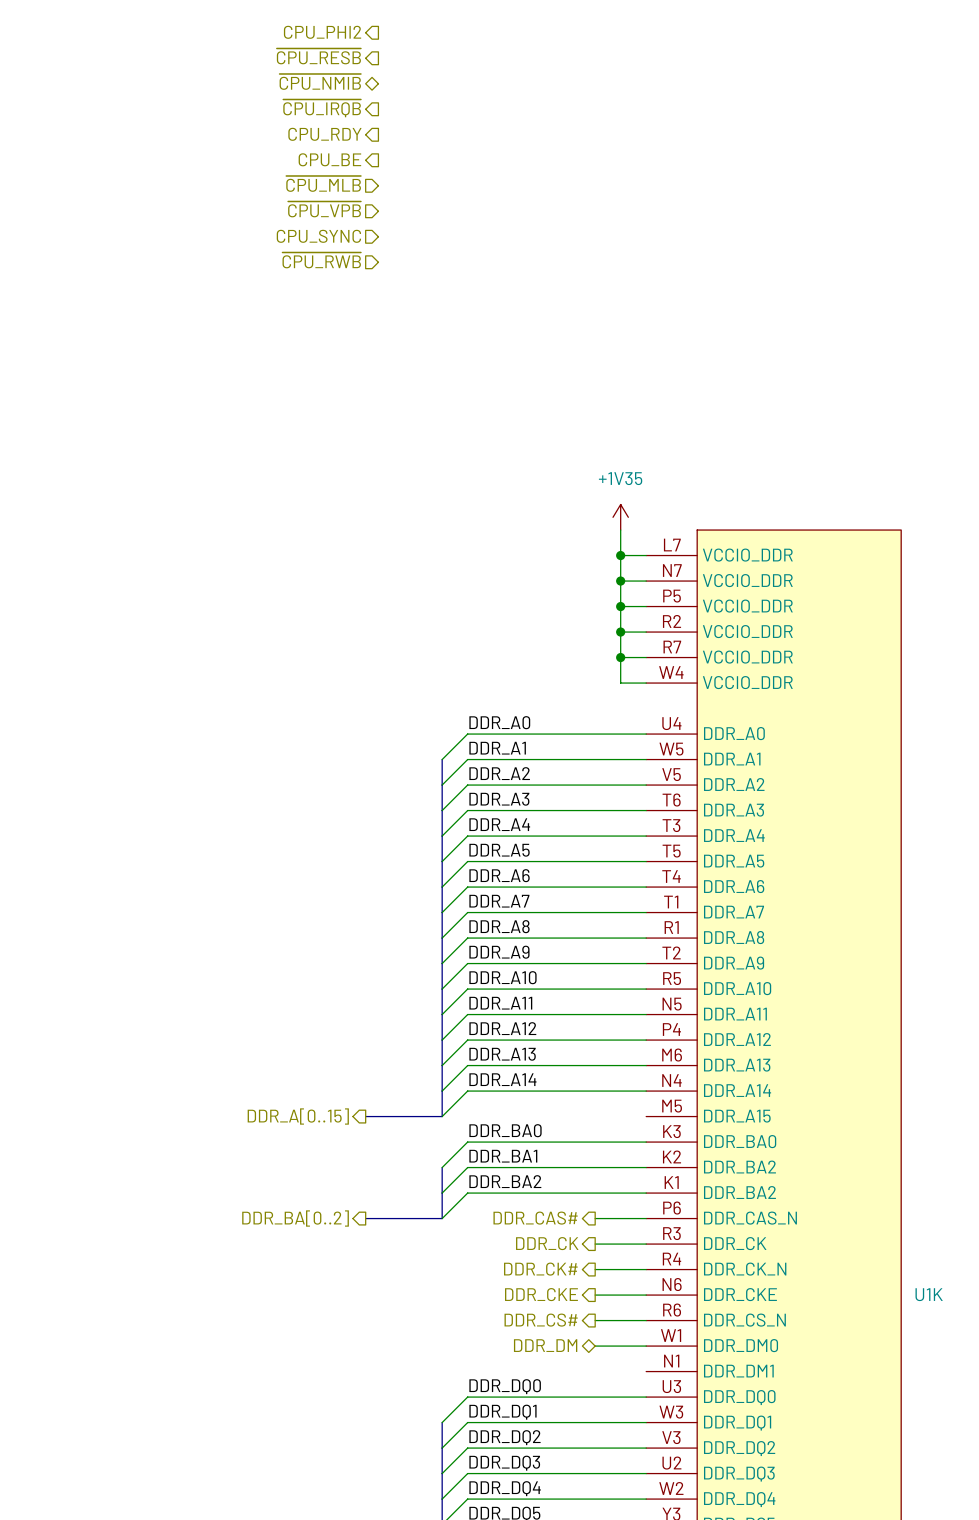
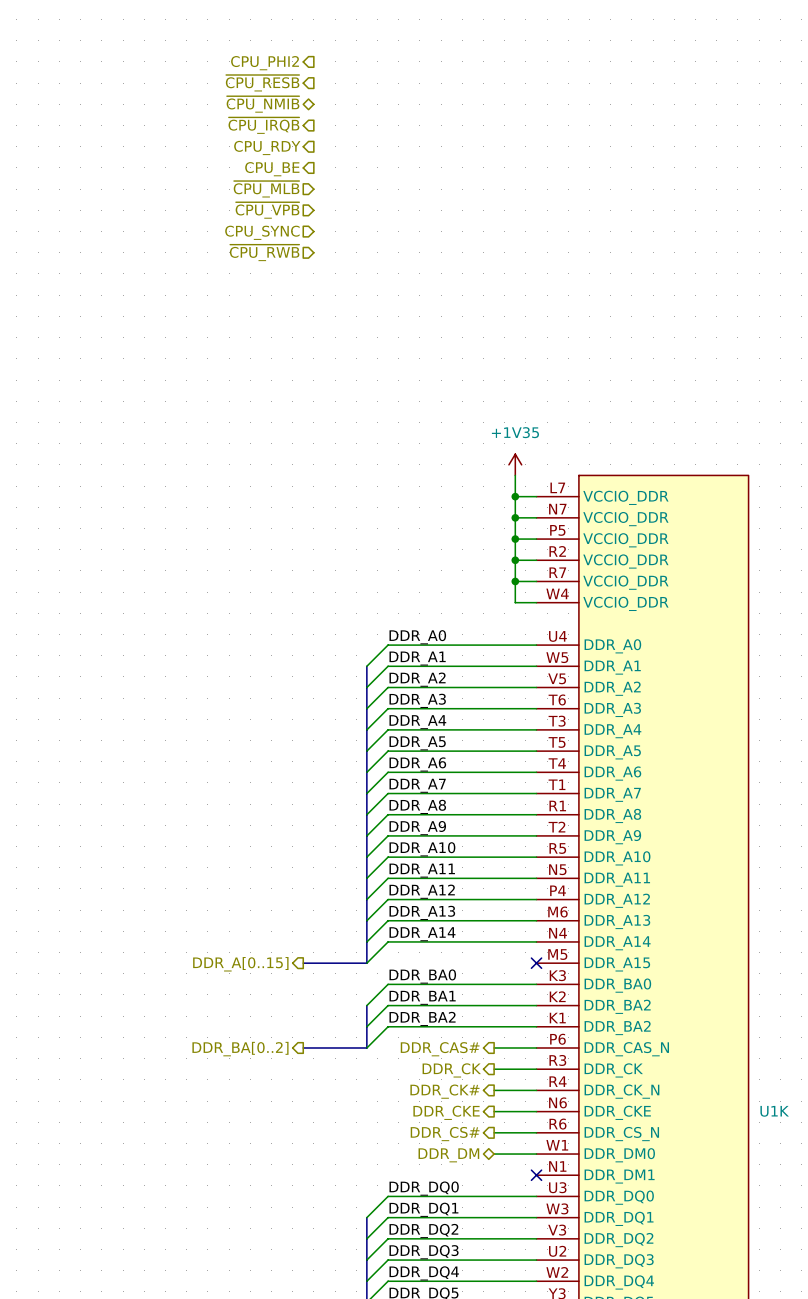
no-connect mark: none -> (536, 963)
no-connect mark: none -> (536, 1175)

